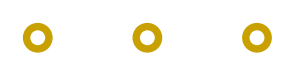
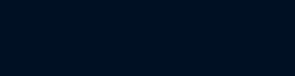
part: (37, 37) -> none
part: (147, 37) -> none
part: (256, 37) -> none

